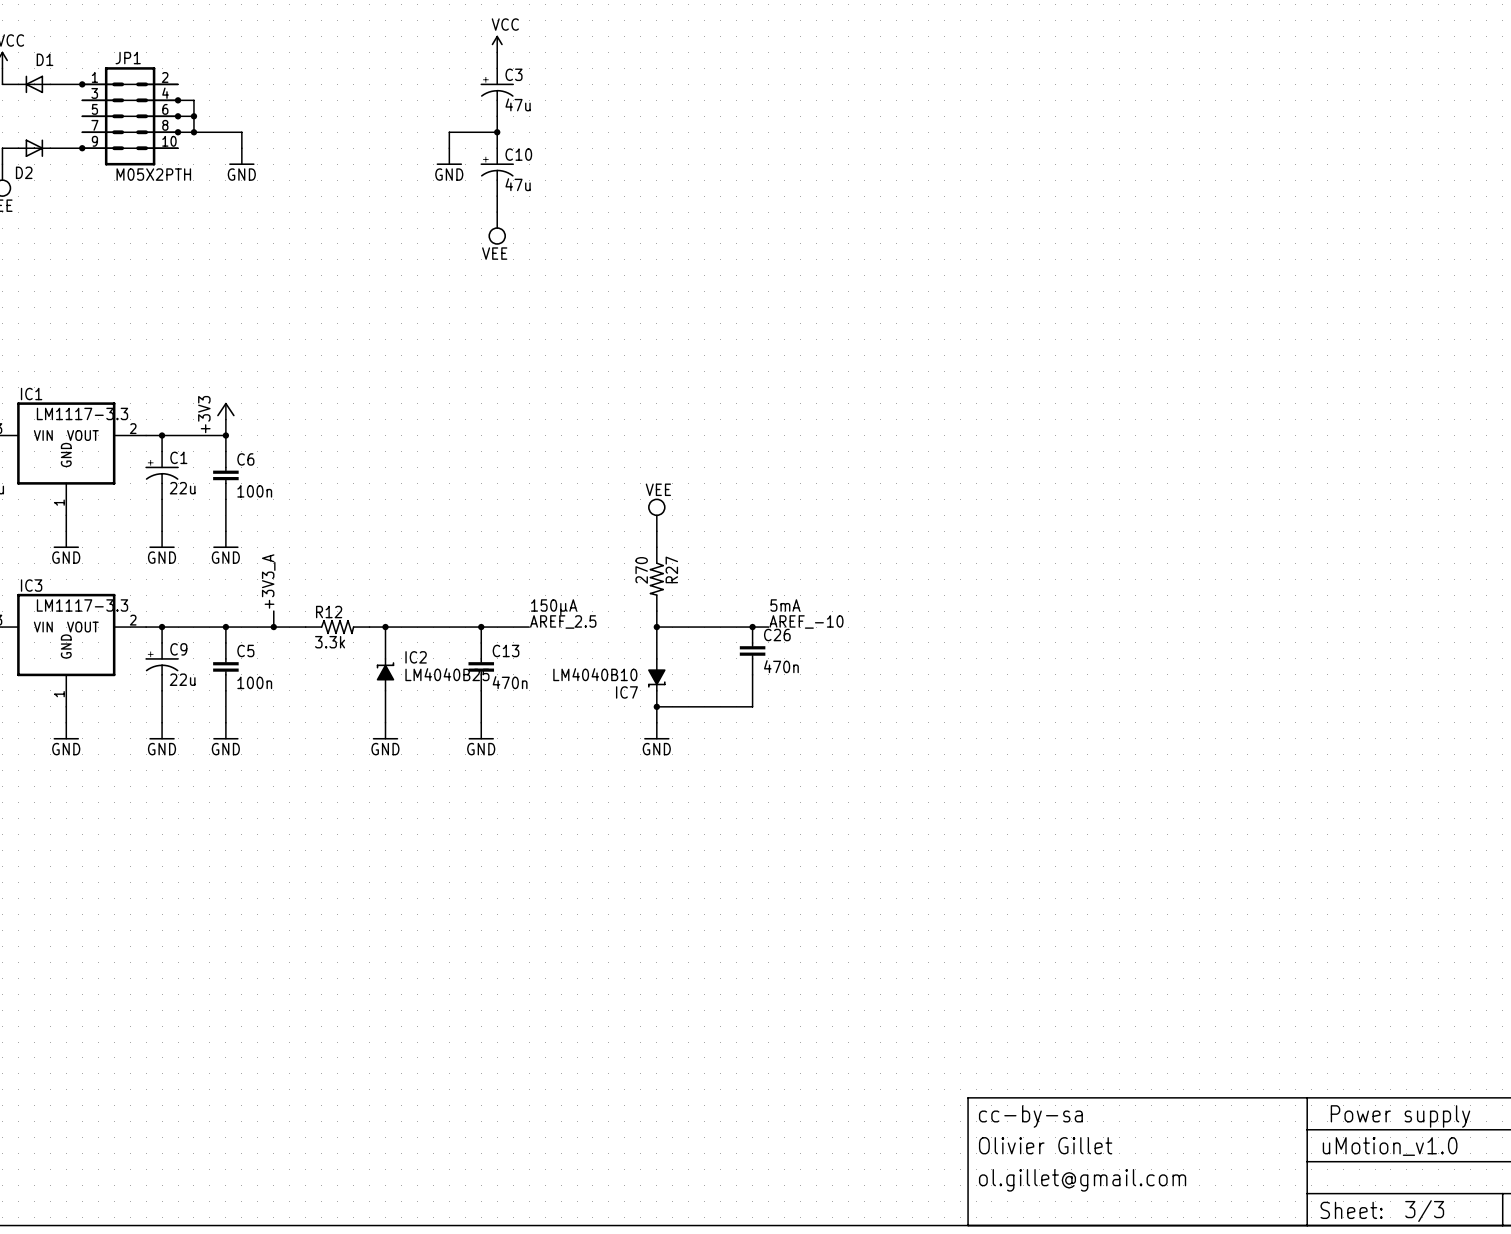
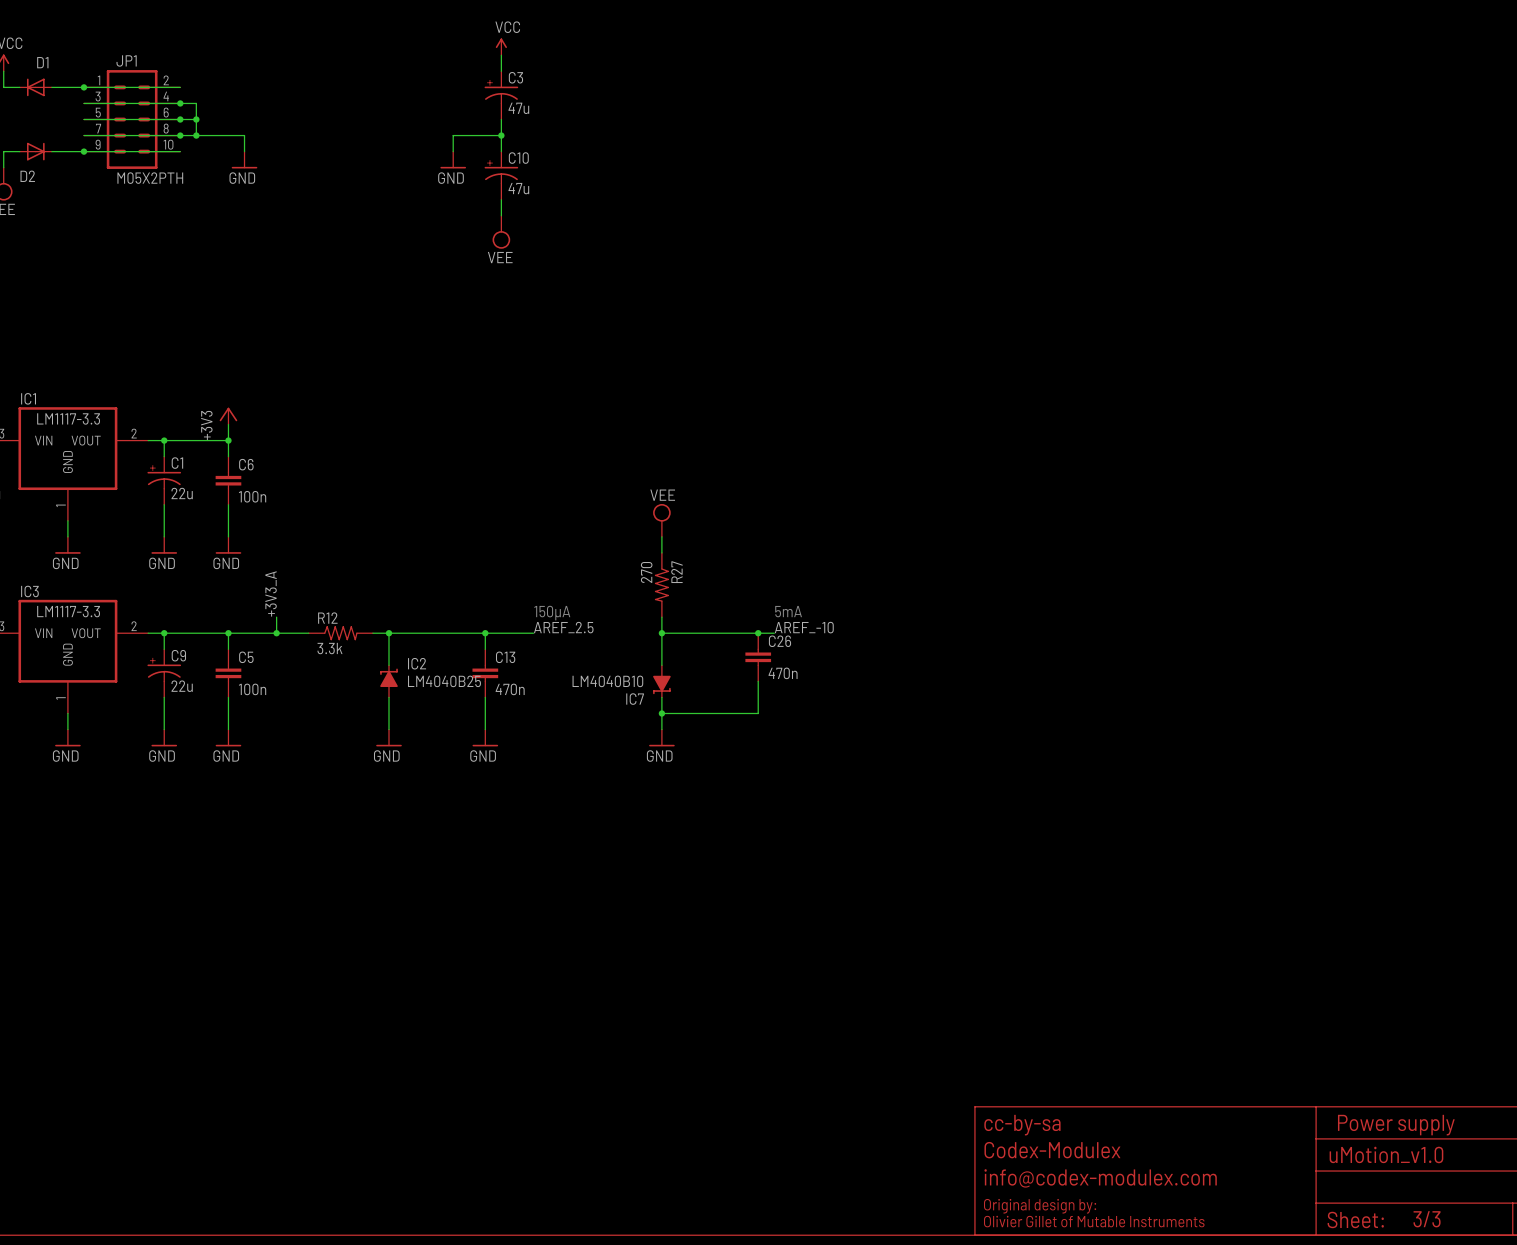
text: Olivier Gillet (1045, 1145) -> Codex-Modulex (1052, 1150)
text: none -> info@codex-modulex.com (1100, 1178)
text: ol.gillet@gmail.com (1082, 1180) -> none
text: none -> Original design by: (1040, 1206)
text: none -> Olivier Gillet of Mutable Instruments (1094, 1221)

